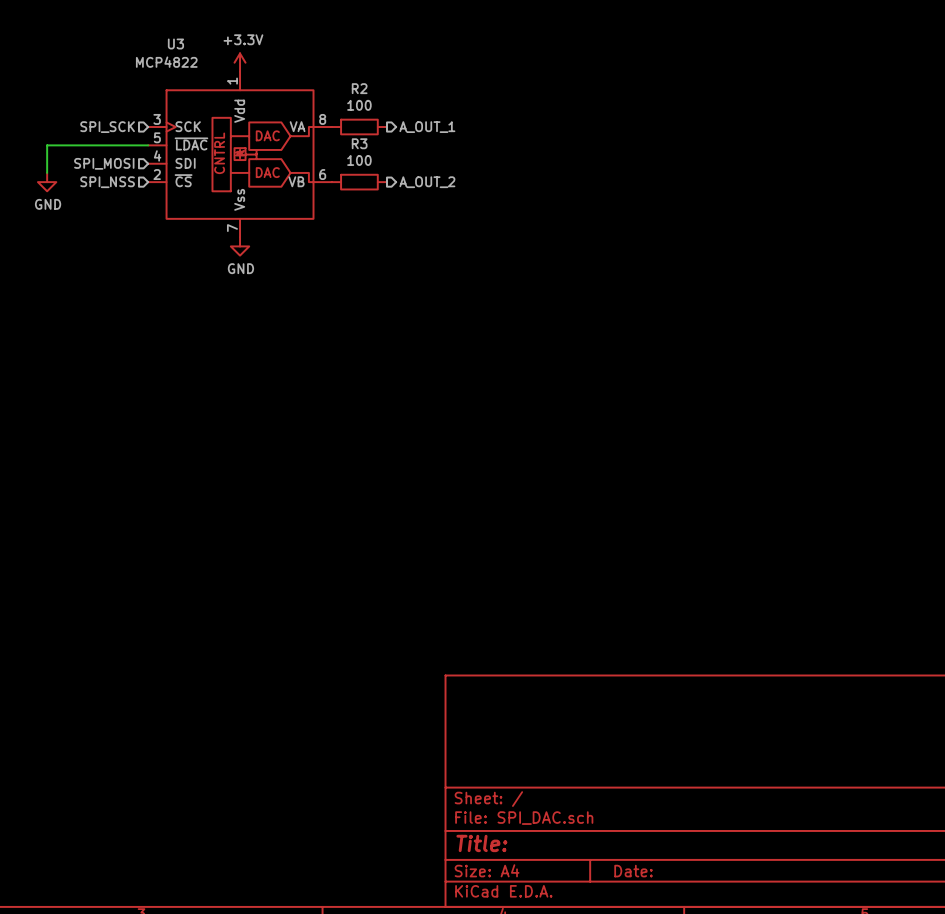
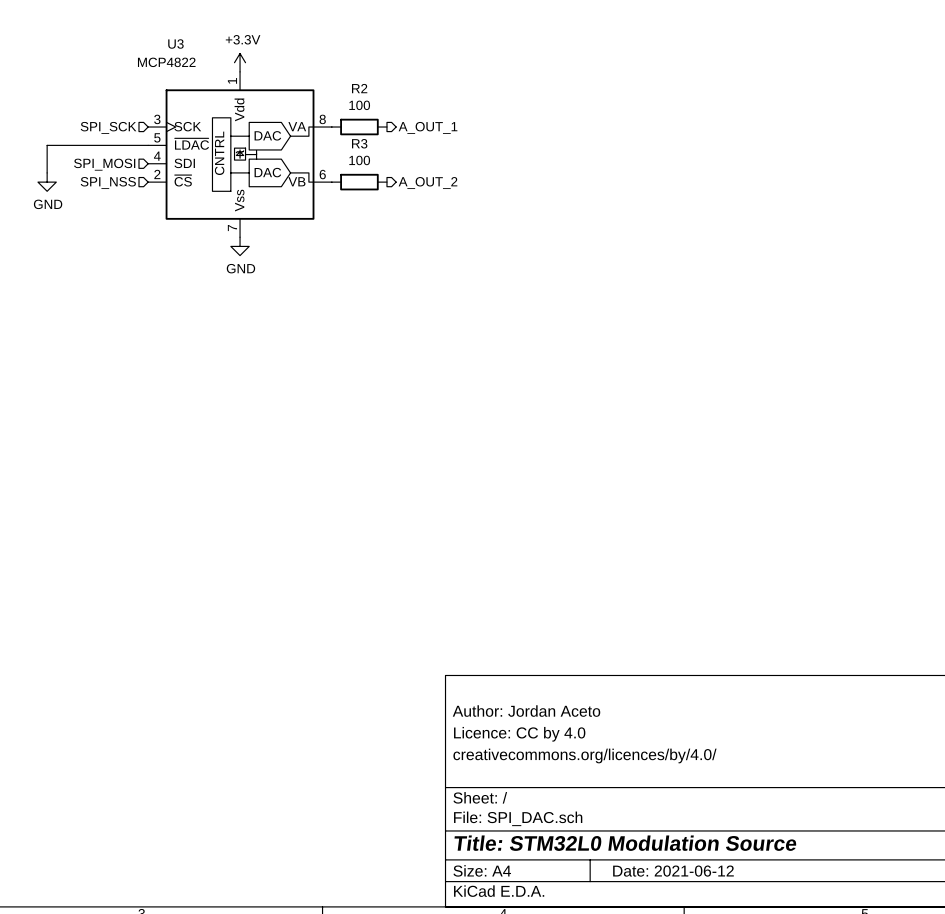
title block: none -> Author: Jordan Aceto (526, 711)
title block: none -> Licence: CC by 4.0 (519, 734)
title block: none -> creativecommons.org/licences/by/4.0/ (584, 755)
title block: Title: (481, 843) -> Title: STM32L0 Modulation Source (625, 843)
title block: Date: (633, 871) -> Date: 2021-06-12 (673, 871)

